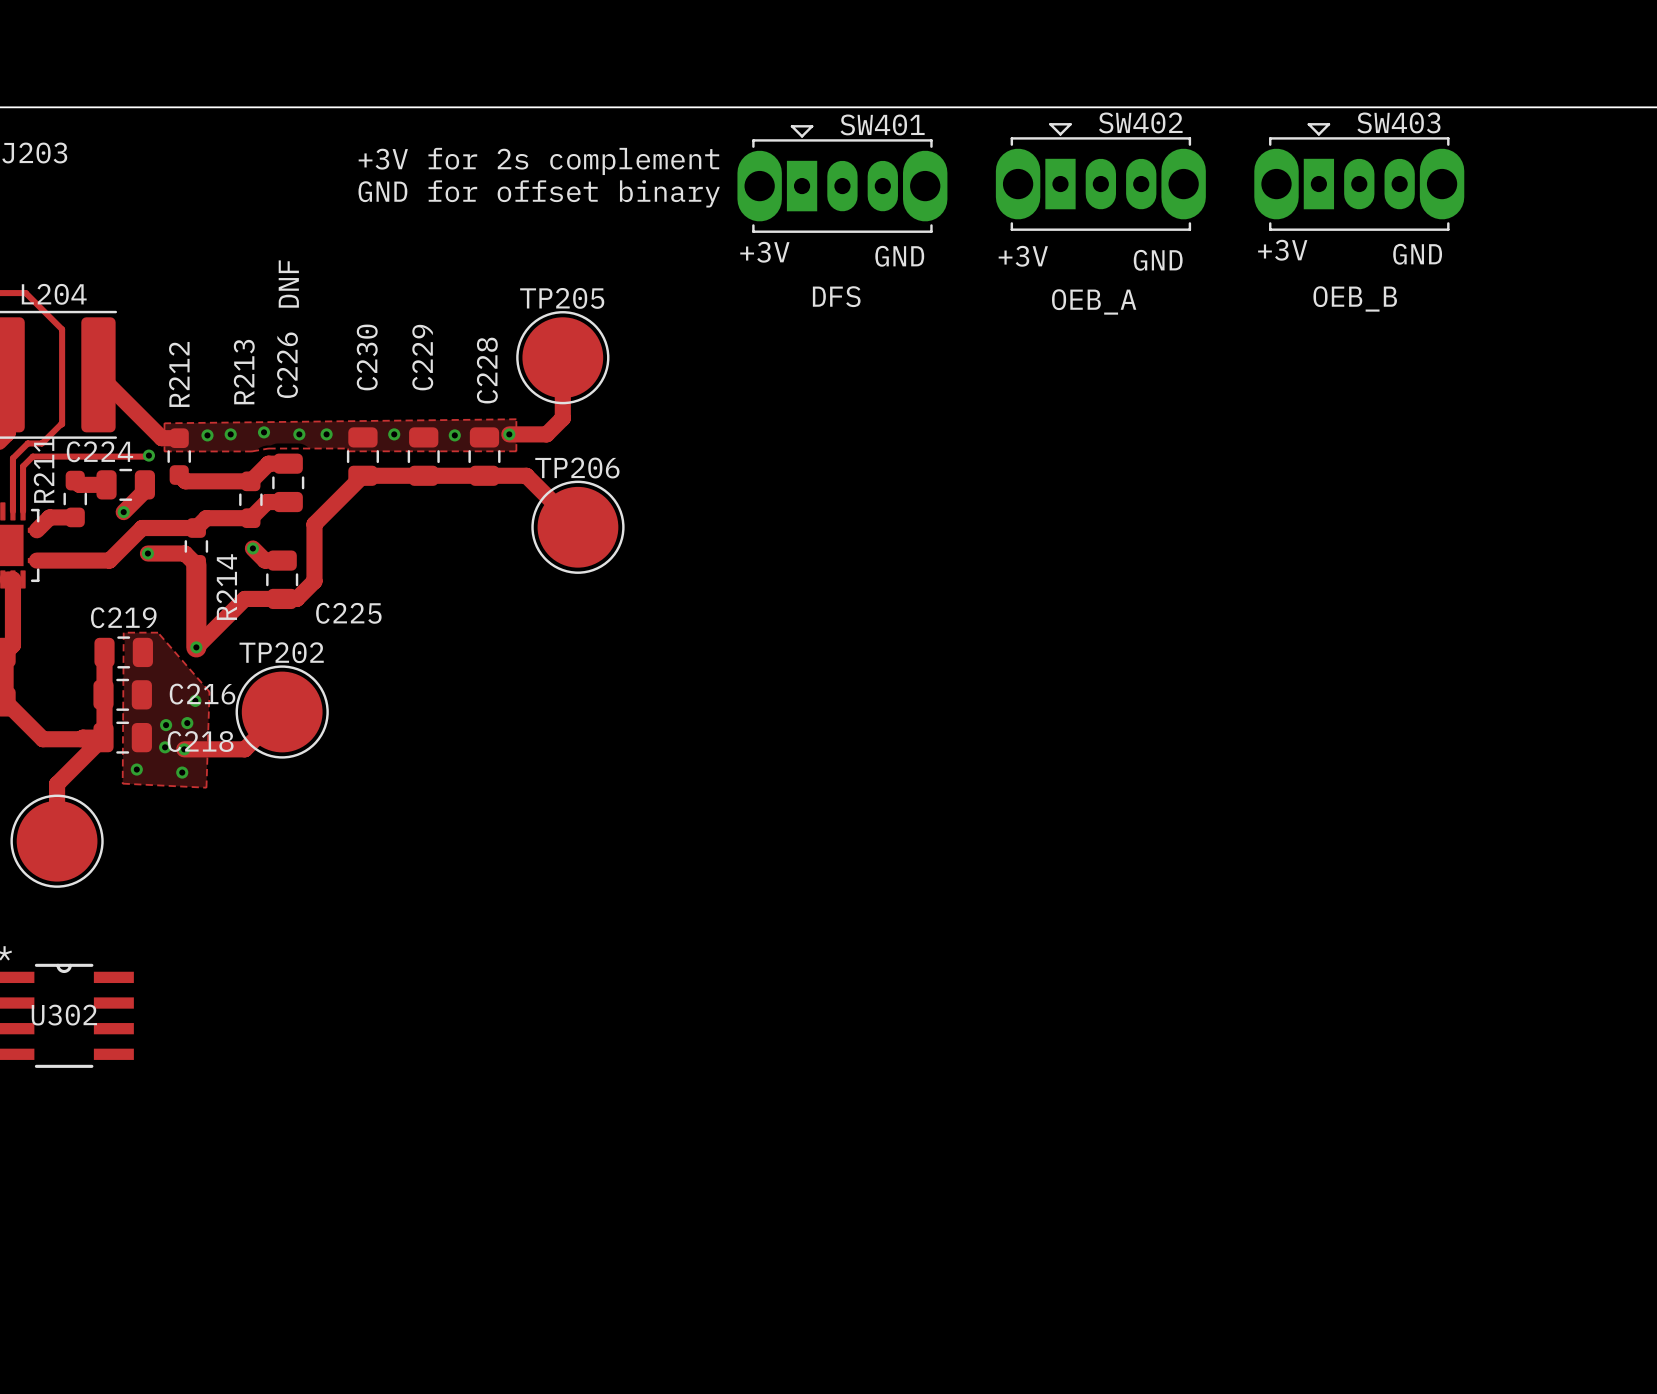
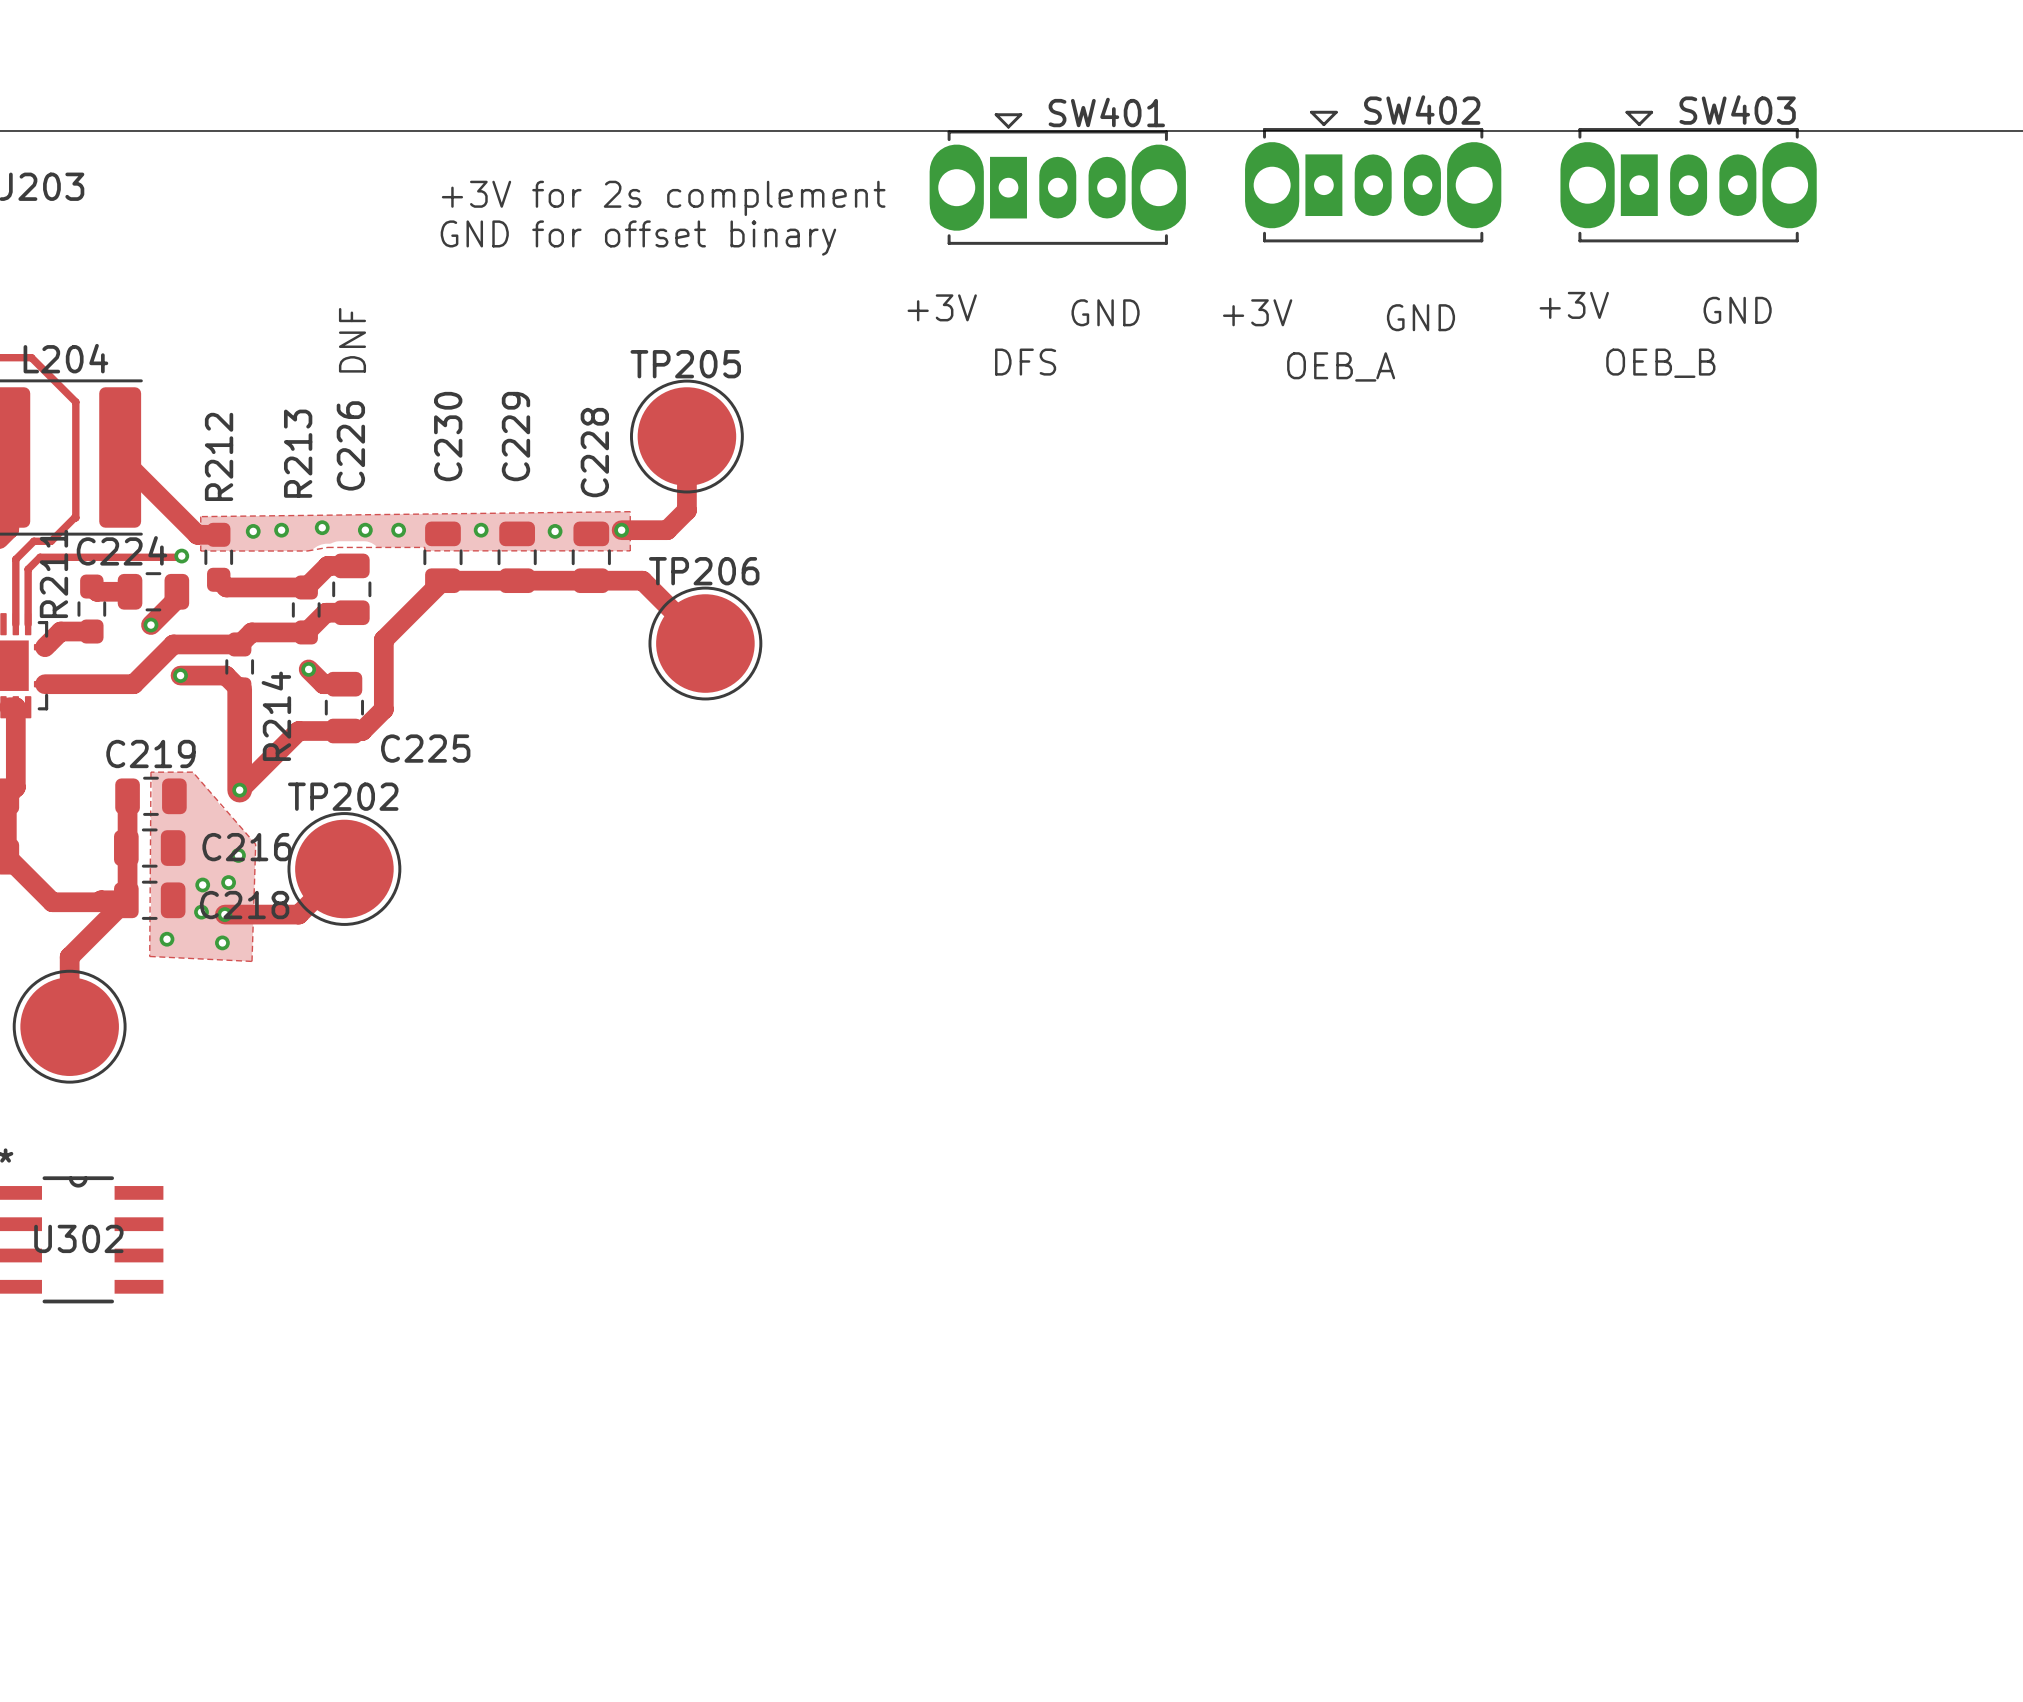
SW402 position: (1100, 176) -> (1373, 176)
SW403 position: (1359, 176) -> (1688, 176)
SW401 position: (842, 179) -> (1057, 179)

